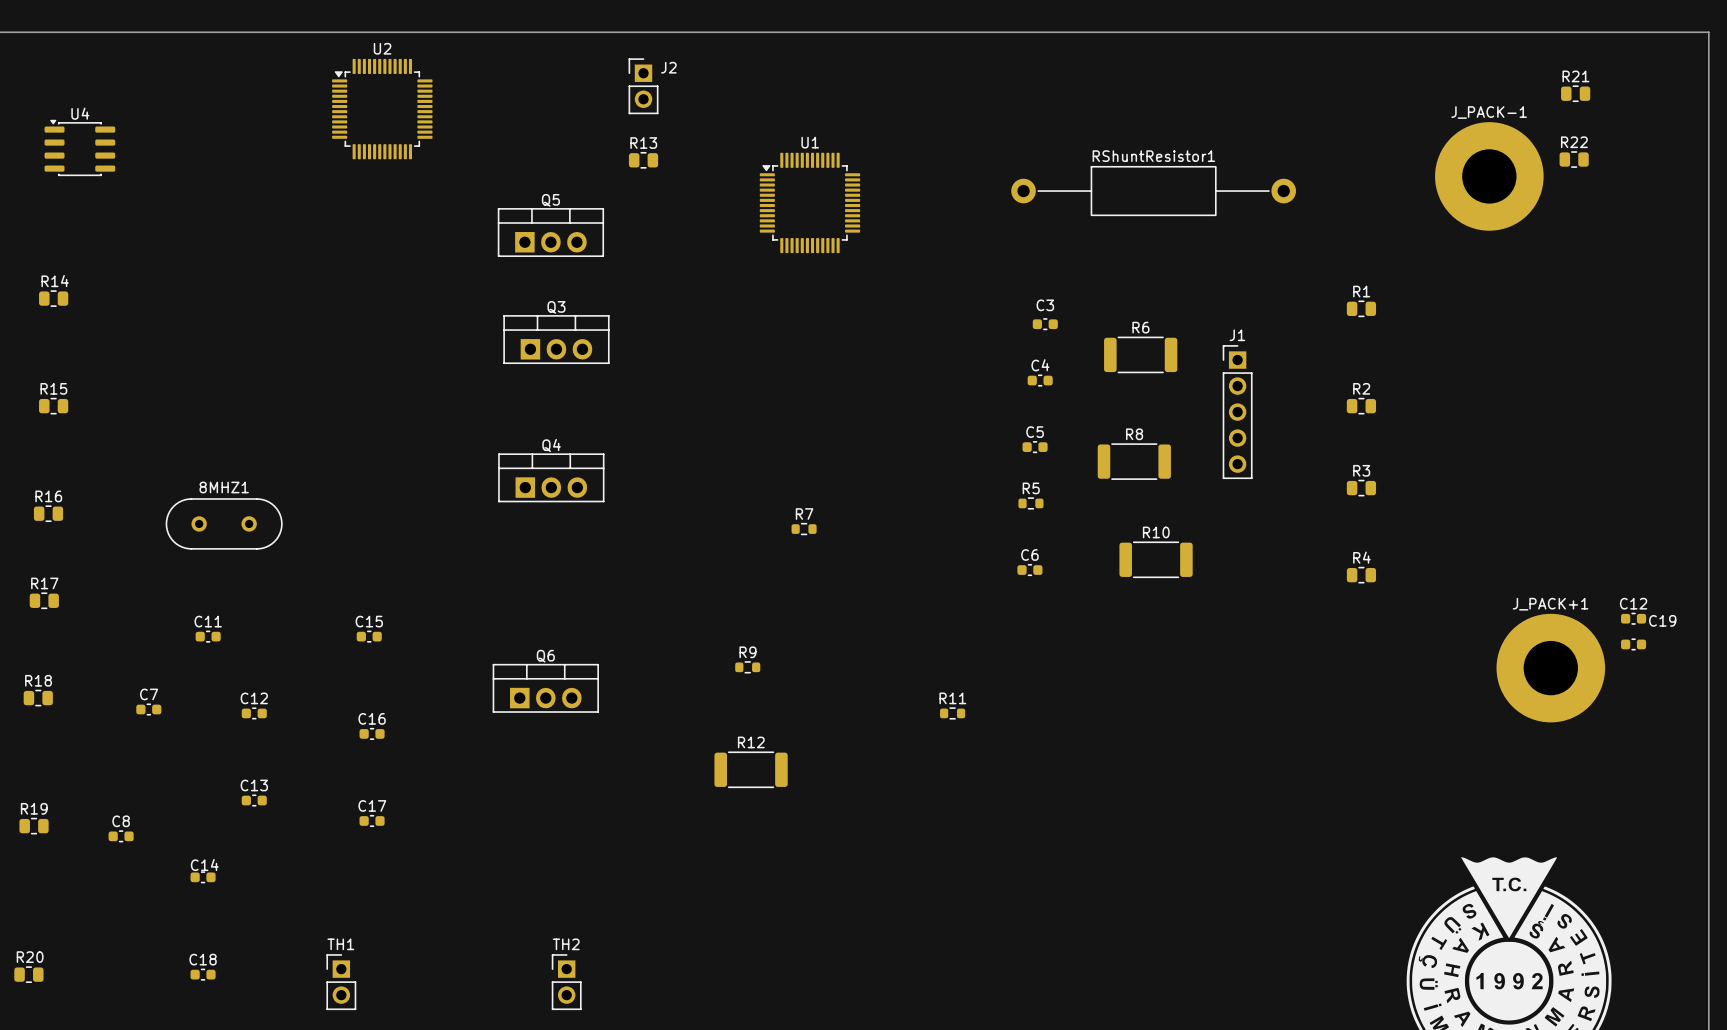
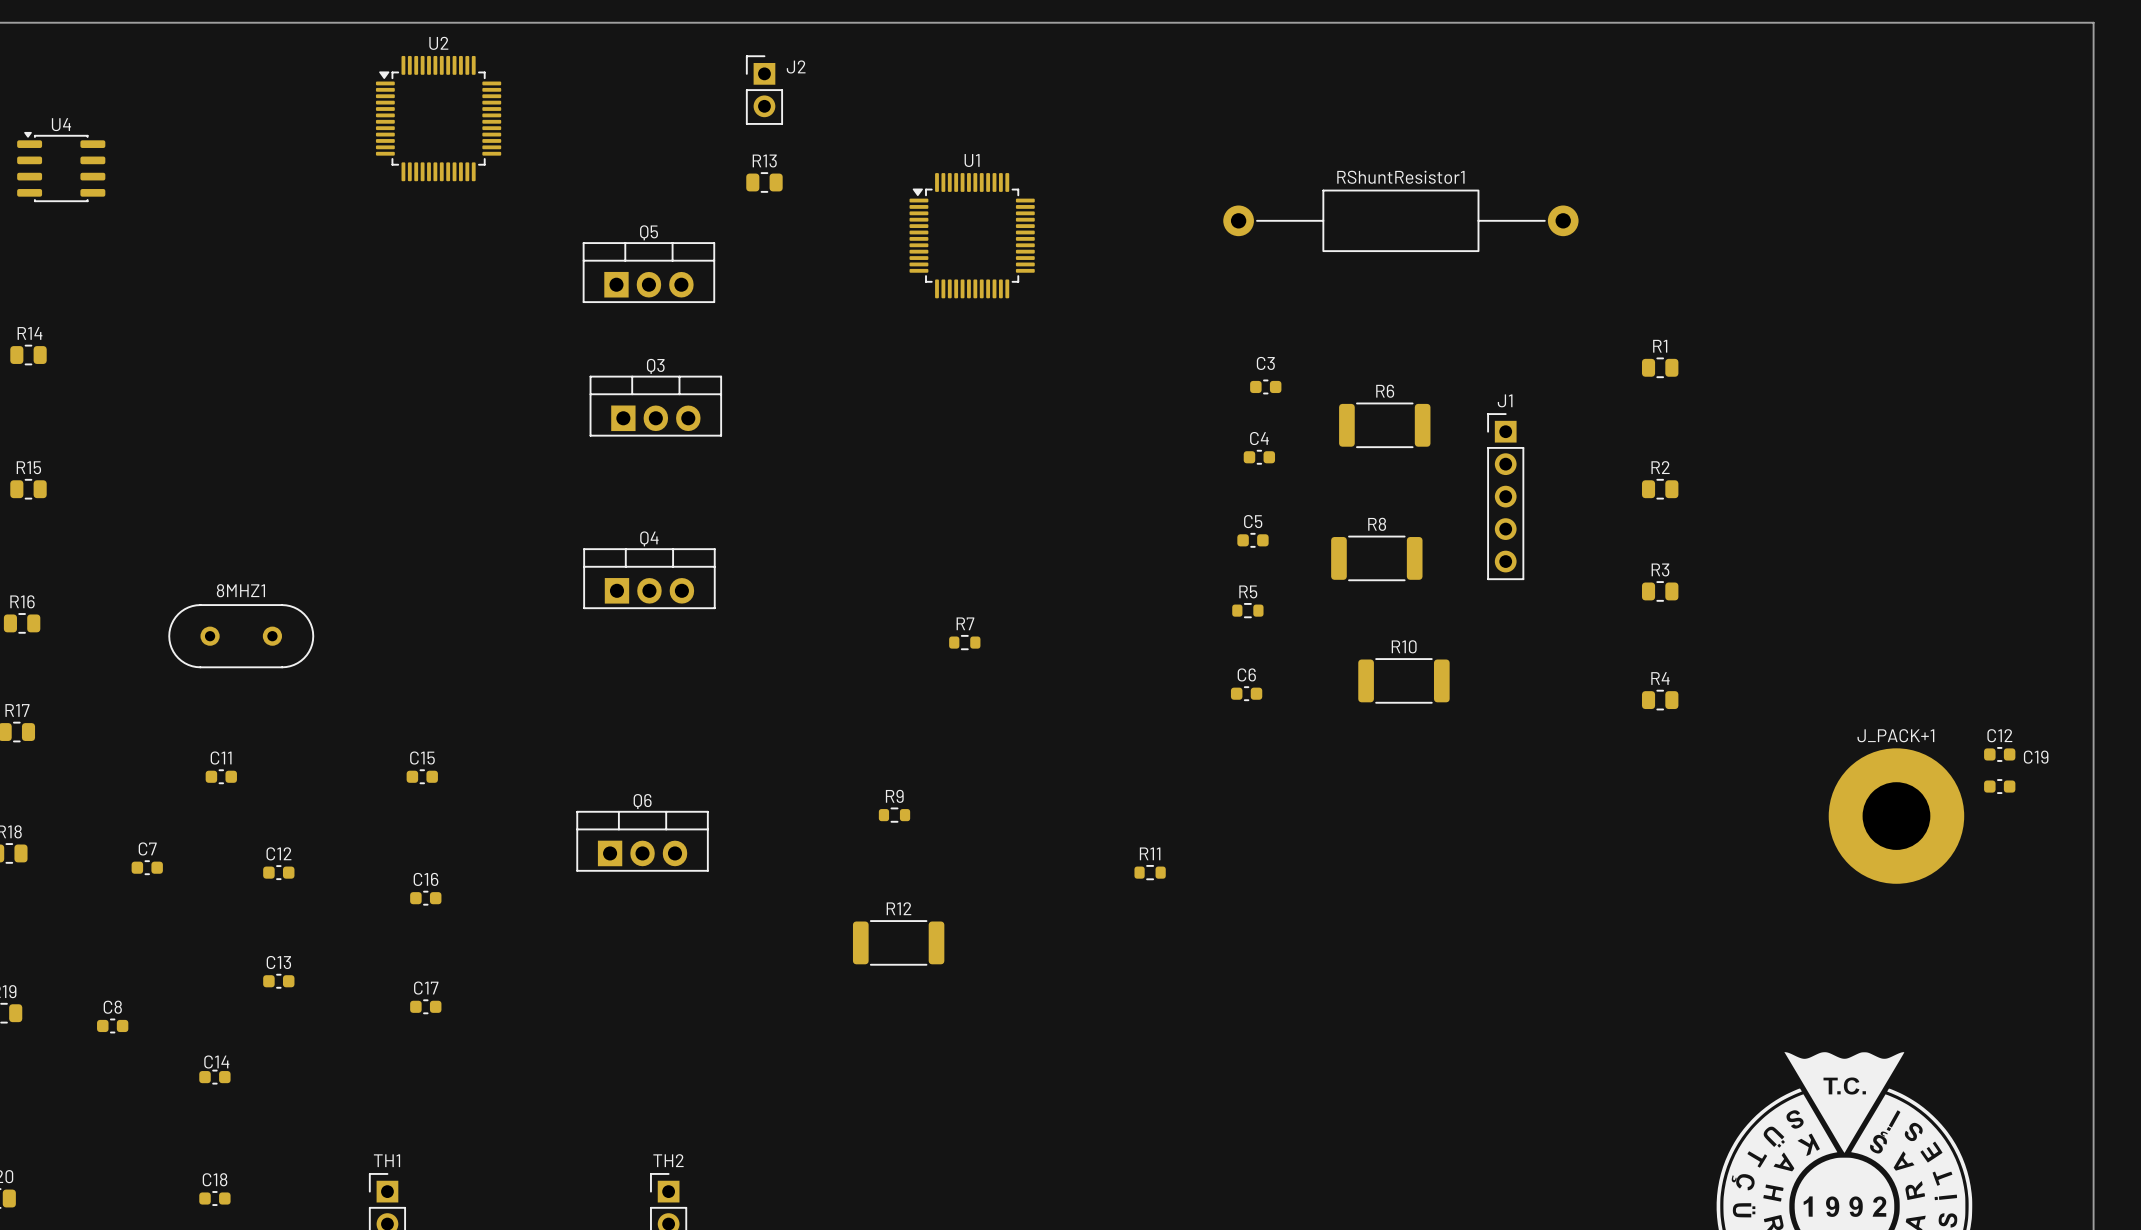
R21: (1575, 93) -> none
R22: (1574, 159) -> none
J_PACK-1: (1489, 176) -> none

